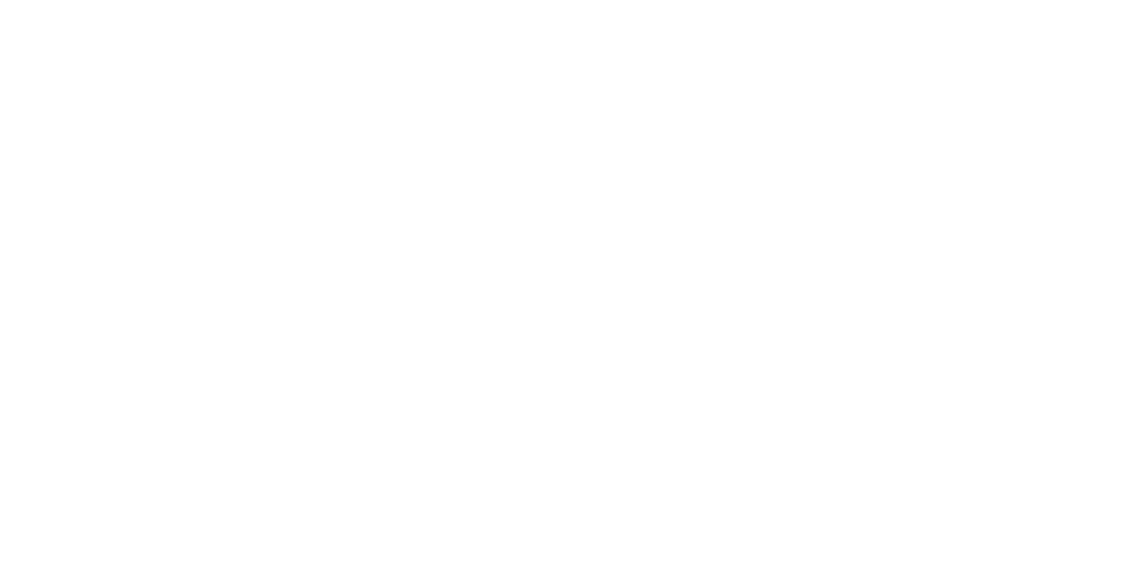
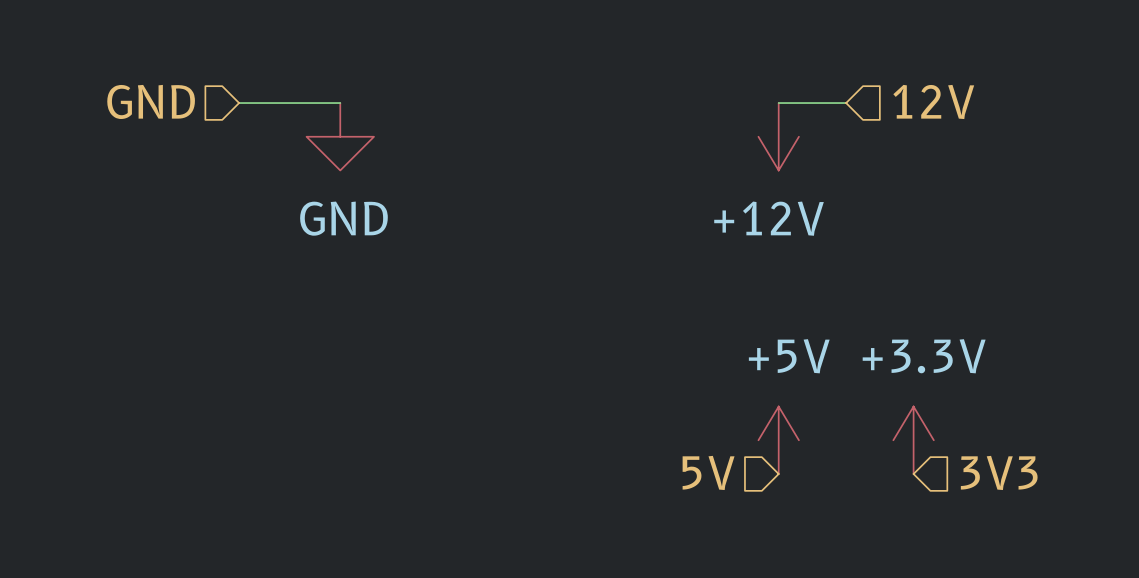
hierarchical label: none -> GND (151, 101)
hierarchical label: none -> 12V (933, 101)
wire: none -> (239, 103) (340, 103)
wire: none -> (778, 103) (846, 103)
power symbol: none -> GND (340, 136)
power symbol: none -> +12V (778, 136)
power symbol: none -> +5V (778, 440)
power symbol: none -> +3.3V (913, 440)
hierarchical label: none -> 5V (708, 472)
hierarchical label: none -> 3V3 (999, 472)

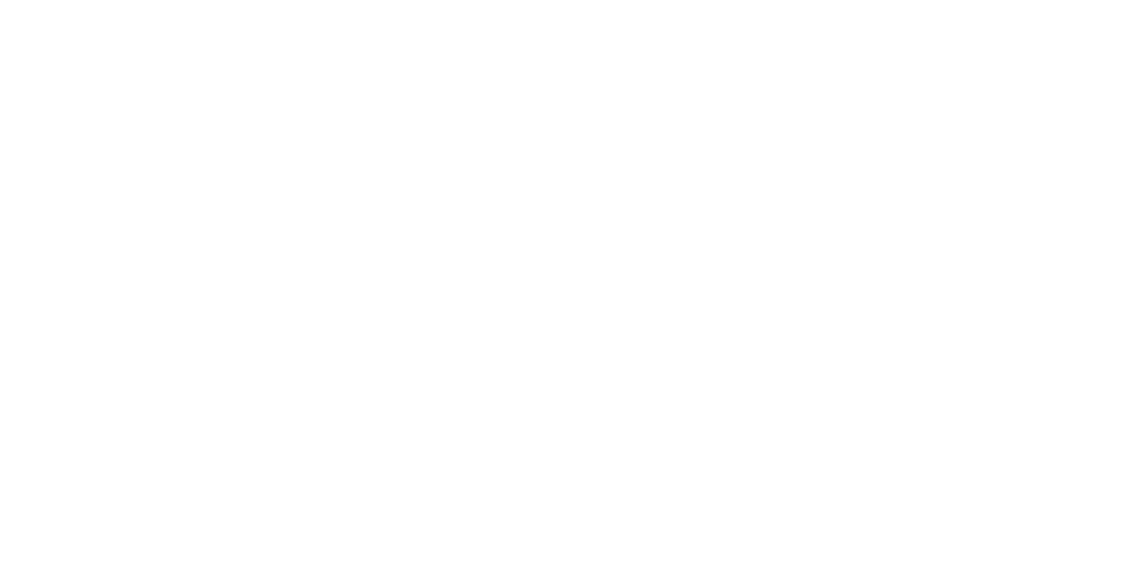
hierarchical label: GND (151, 101) -> none
hierarchical label: 12V (933, 101) -> none
wire: (239, 103) (340, 103) -> none
wire: (778, 103) (846, 103) -> none
power symbol: GND (340, 136) -> none
power symbol: +12V (778, 136) -> none
power symbol: +5V (778, 440) -> none
power symbol: +3.3V (913, 440) -> none
hierarchical label: 5V (708, 472) -> none
hierarchical label: 3V3 (999, 472) -> none

